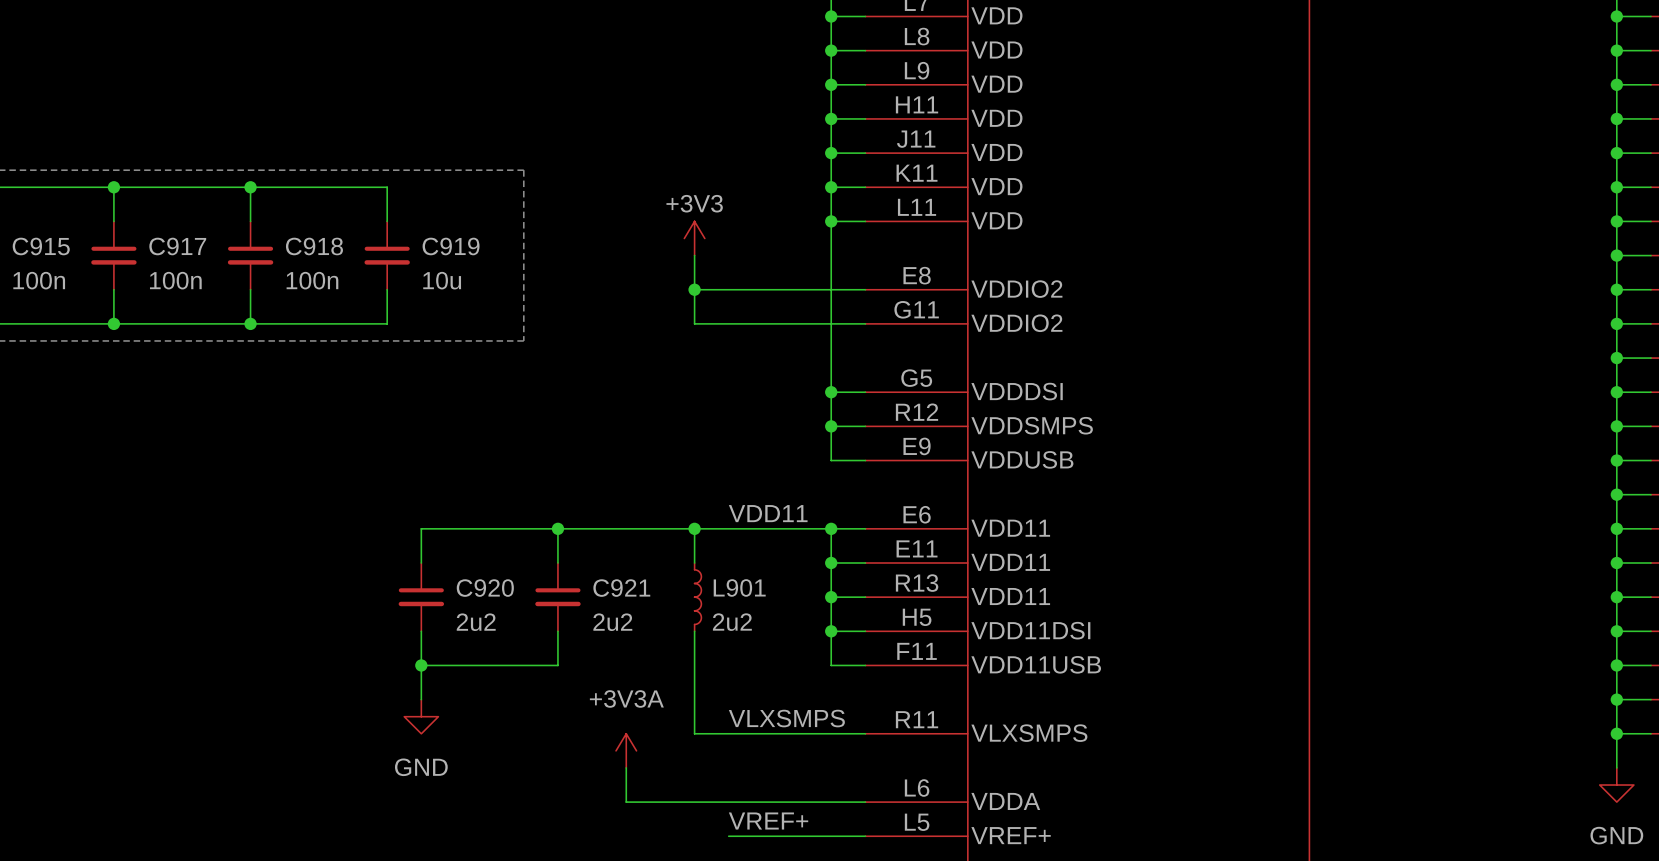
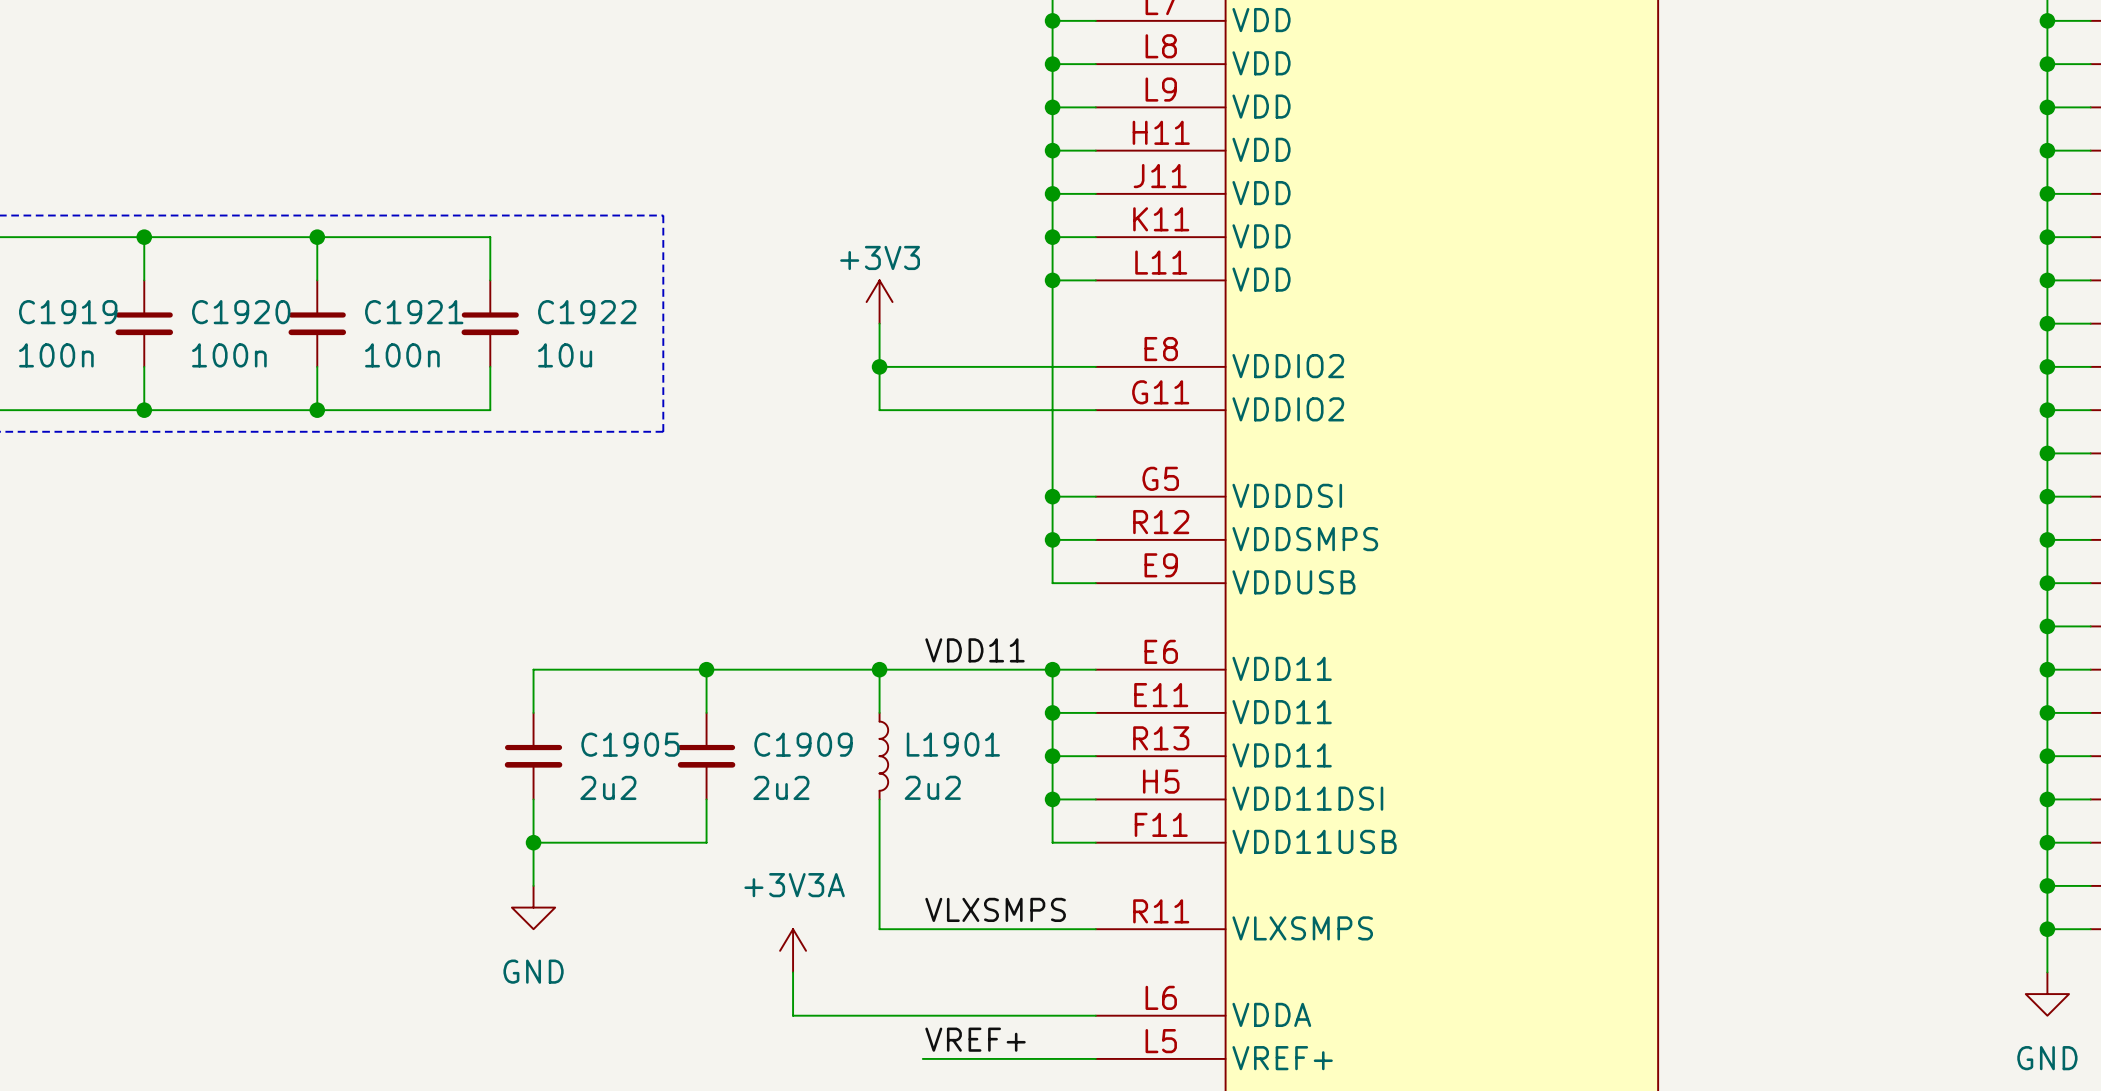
C915 name: C915 (41, 246) -> C1919 (68, 312)
C917 name: C917 (177, 246) -> C1920 (241, 312)
C918 name: C918 (314, 246) -> C1921 (414, 312)
C919 name: C919 (451, 246) -> C1922 (587, 312)
L901 name: L901 (739, 587) -> L1901 (953, 744)
C920 name: C920 (485, 588) -> C1905 (630, 744)
C921 name: C921 (621, 588) -> C1909 (803, 744)

